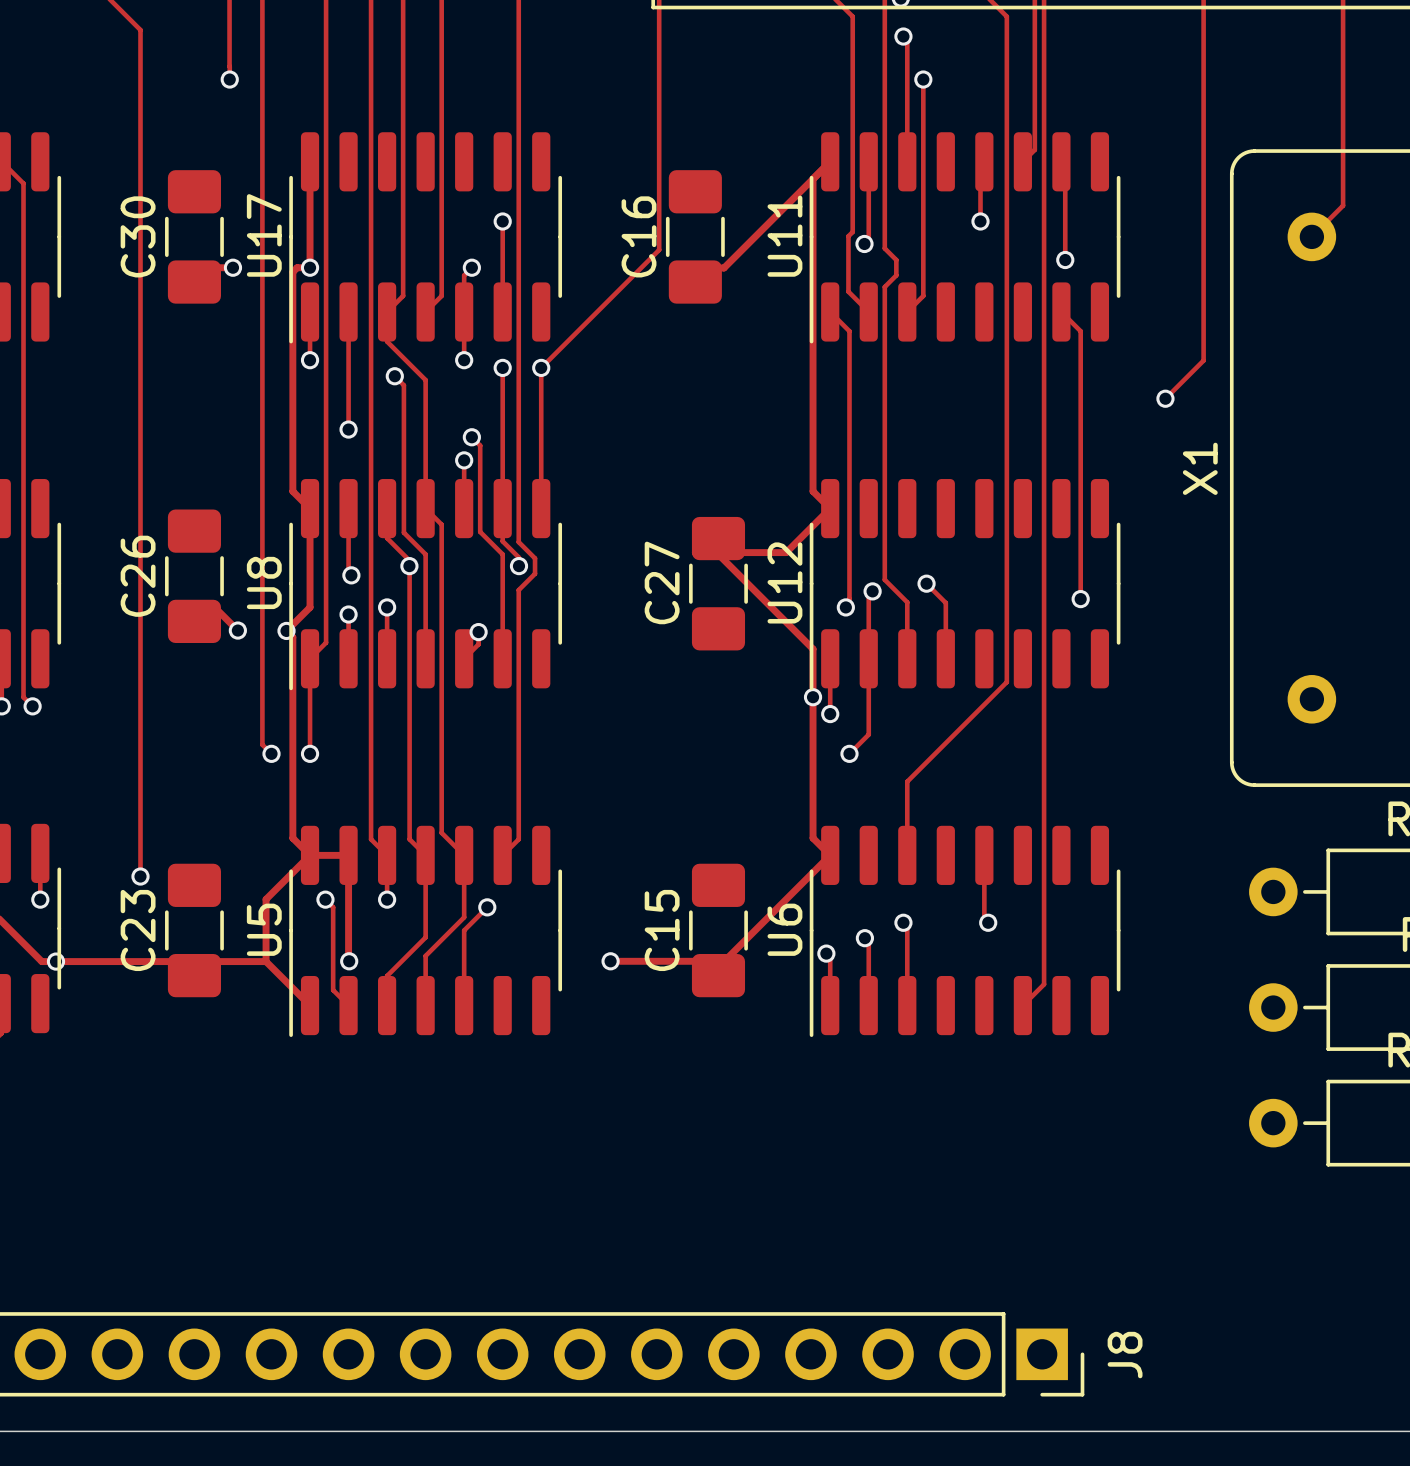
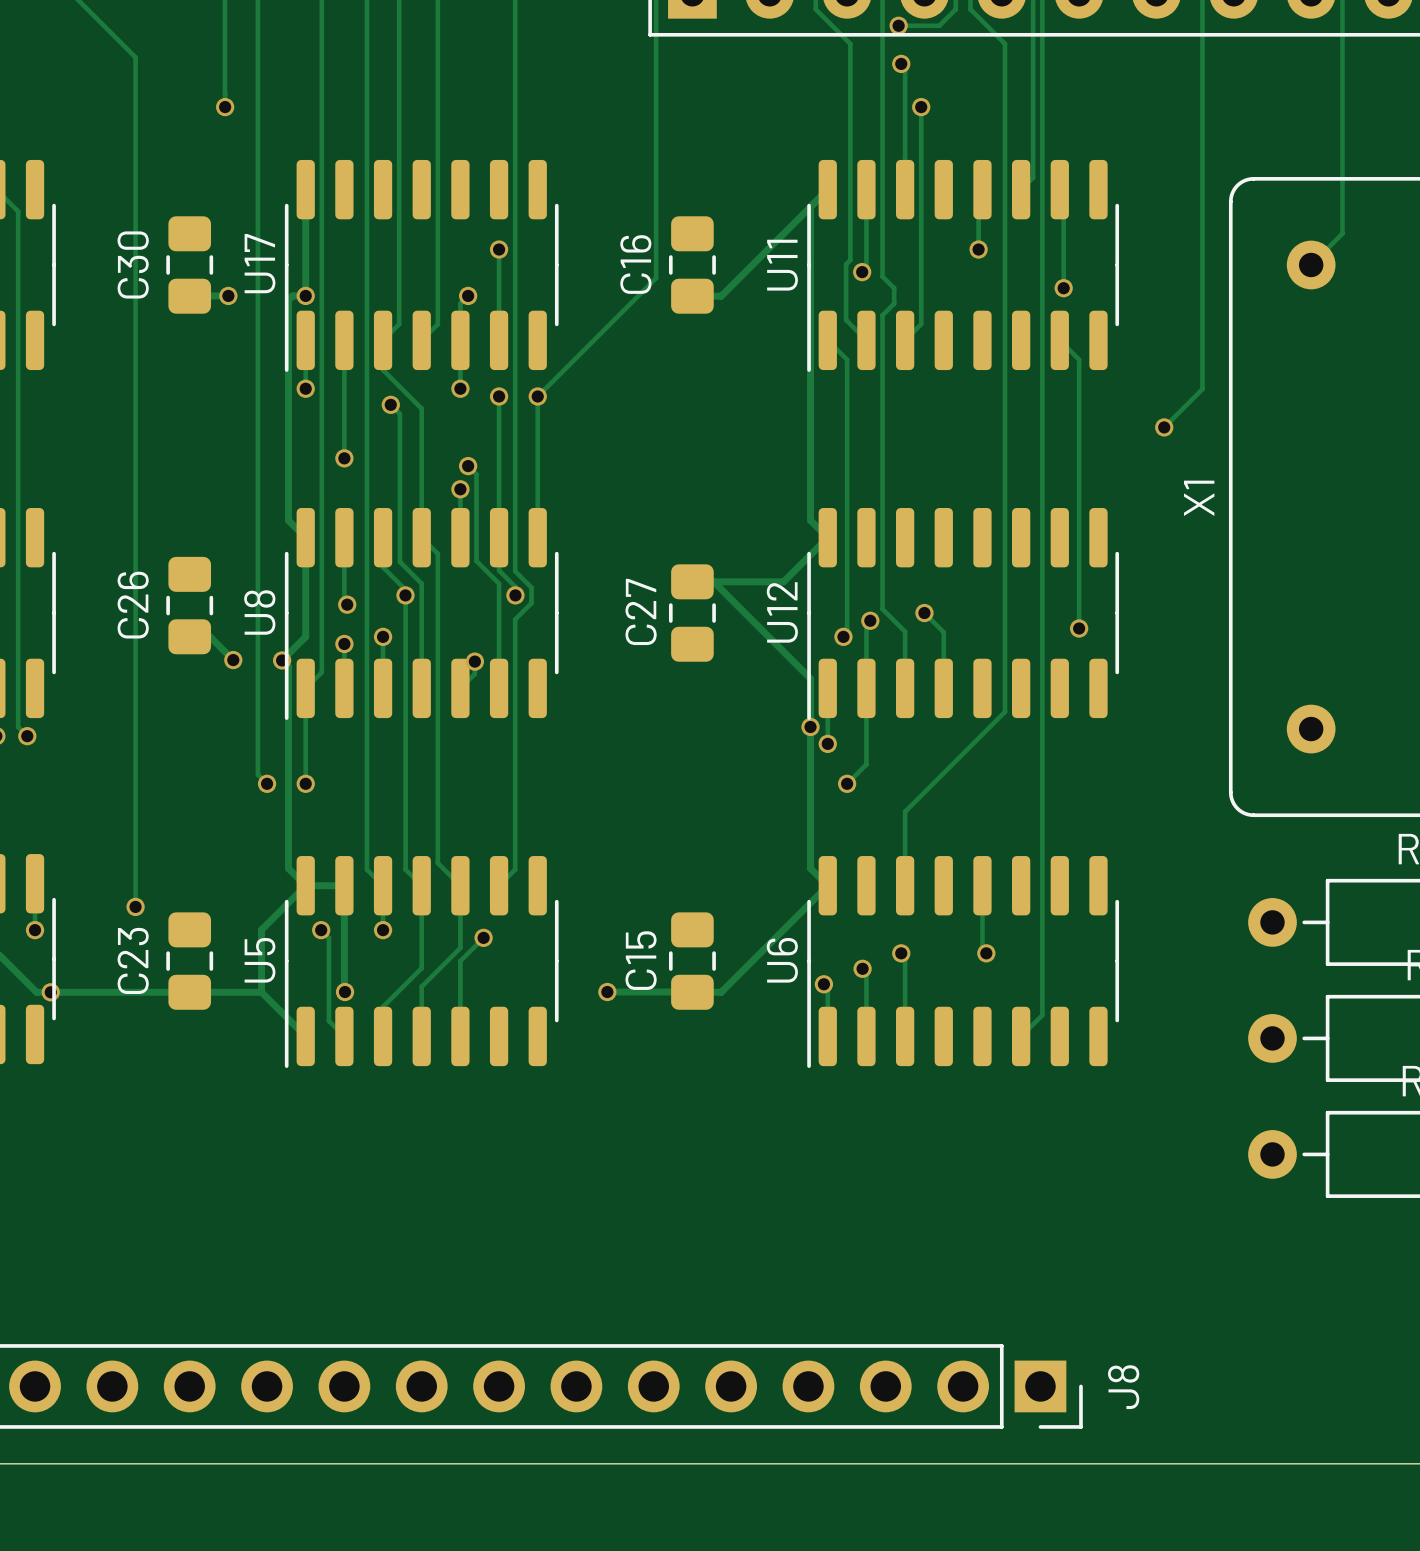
C30 footprint: [165, 170, 224, 304] -> [166, 216, 214, 314]
C16 footprint: [665, 170, 725, 304] -> [668, 216, 716, 314]
C26 footprint: [165, 509, 224, 644] -> [166, 556, 214, 655]
C27 footprint: [689, 516, 748, 651] -> [668, 564, 716, 662]
C23 footprint: [165, 863, 224, 998] -> [166, 912, 214, 1010]
C15 footprint: [689, 863, 748, 998] -> [668, 912, 716, 1010]

